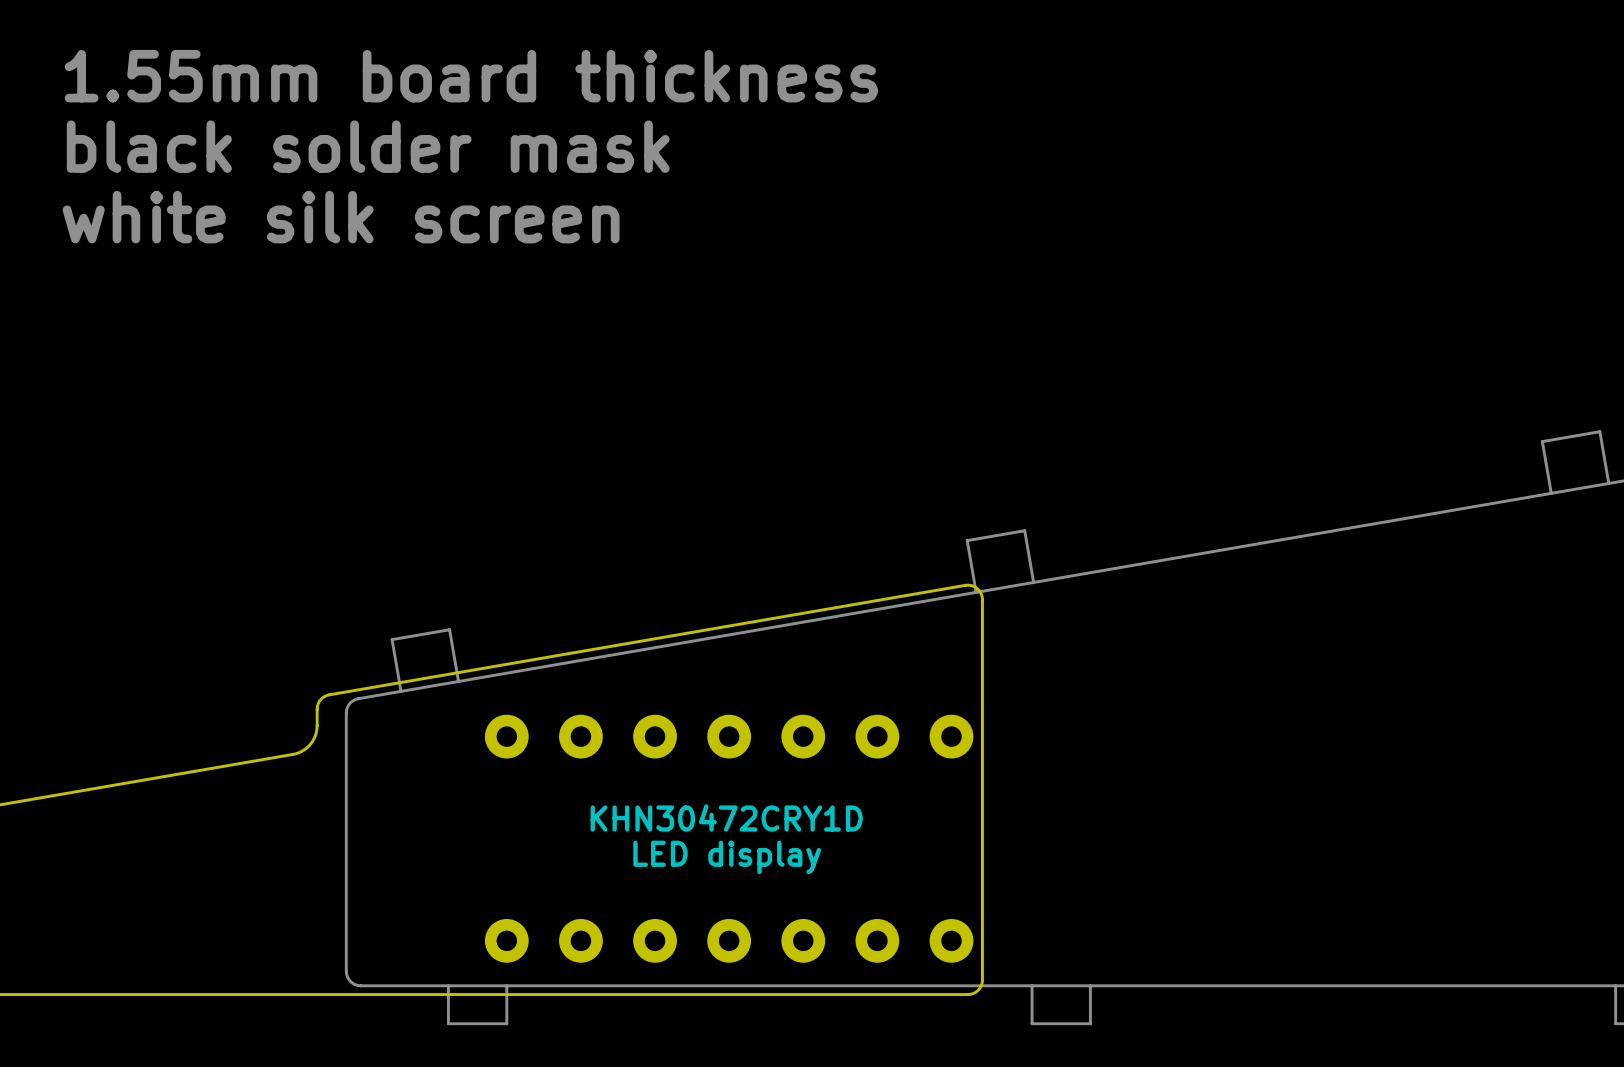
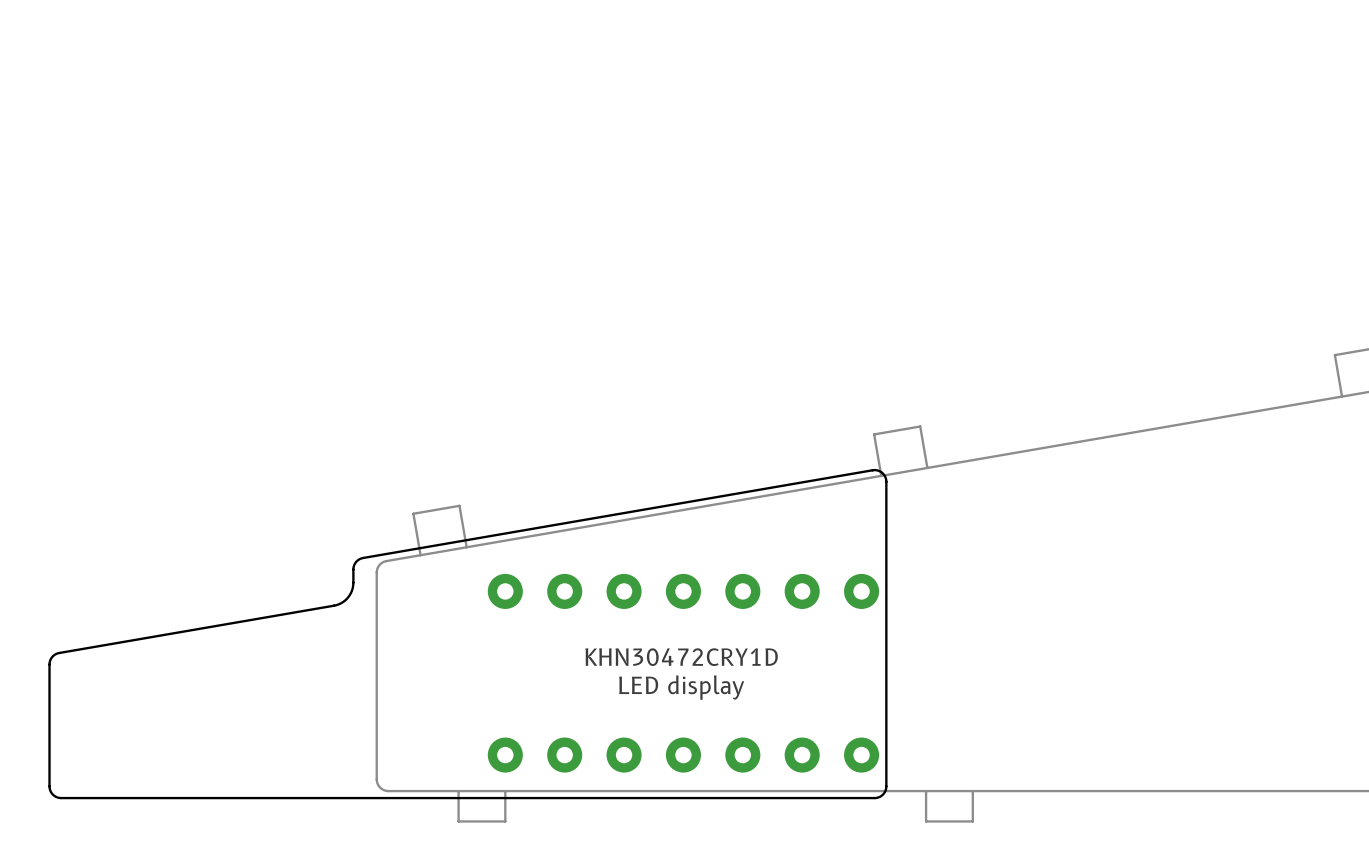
text: 1.55mm board thickness (471, 76) -> none
text: black solder mask (368, 146) -> none
text: white silk screen (341, 217) -> none

